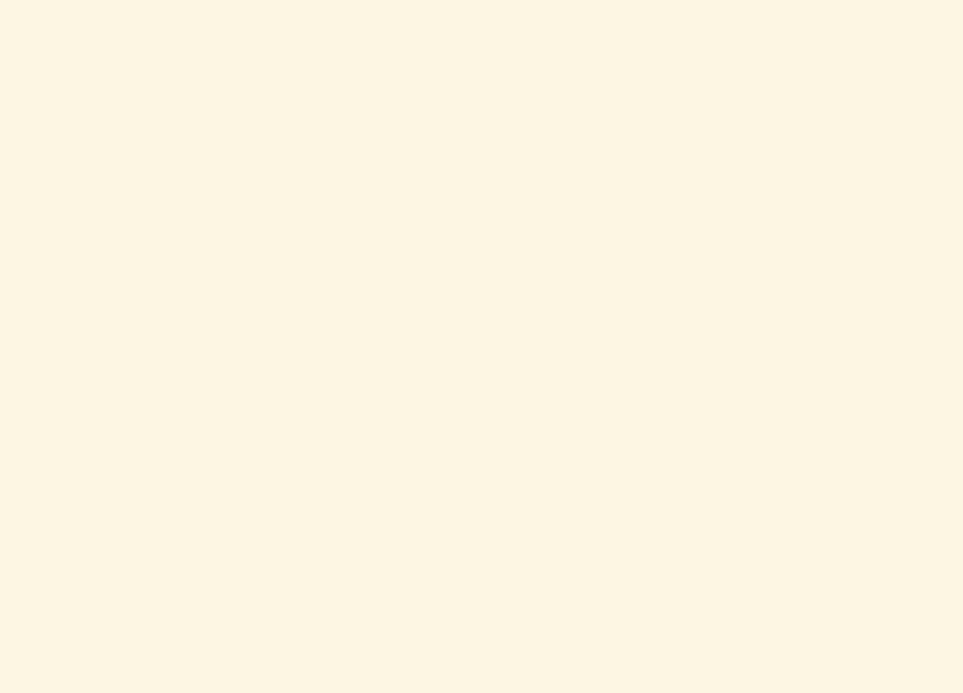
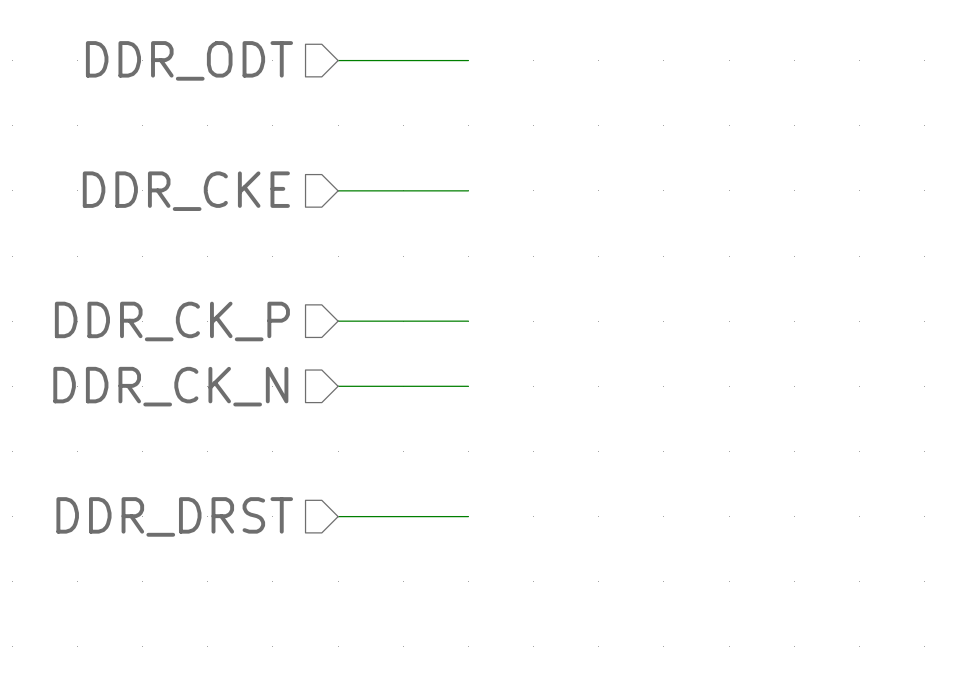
hierarchical label: none -> DDR_ODT (189, 60)
wire: none -> (338, 60) (468, 60)
wire: none -> (338, 190) (468, 190)
hierarchical label: none -> DDR_CKE (186, 191)
hierarchical label: none -> DDR_CK_P (172, 321)
wire: none -> (338, 321) (468, 321)
hierarchical label: none -> DDR_CK_N (170, 386)
wire: none -> (338, 386) (468, 386)
hierarchical label: none -> DDR_DRST (174, 516)
wire: none -> (338, 516) (468, 516)

